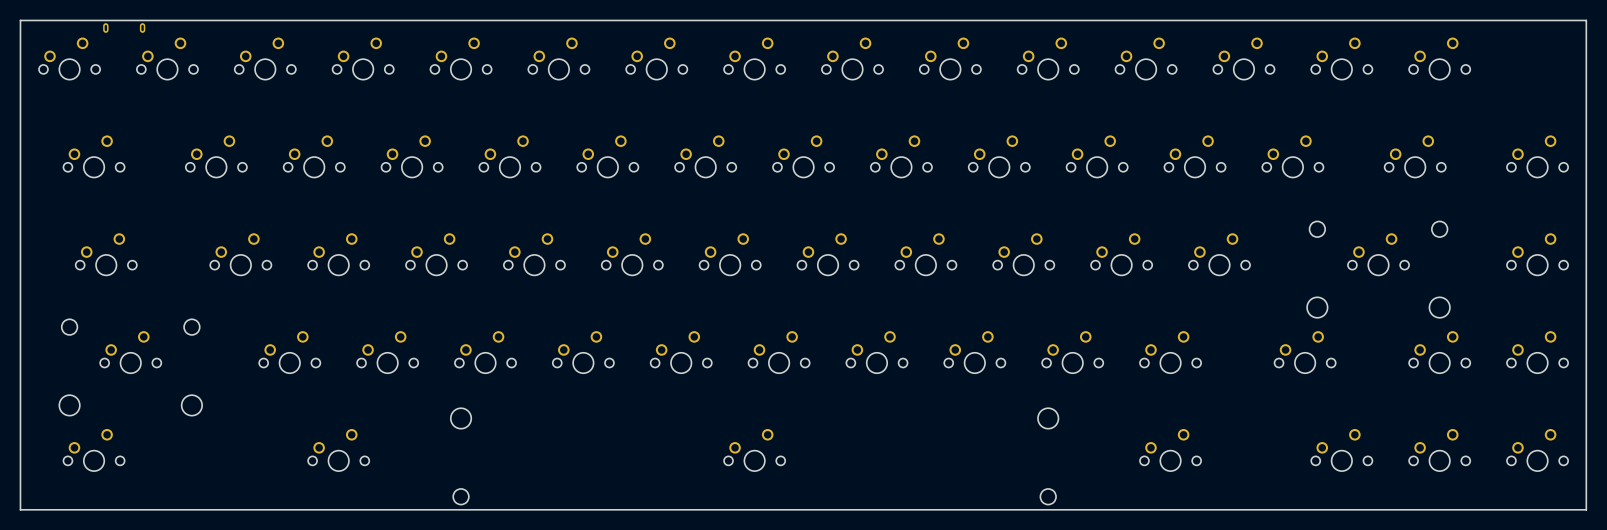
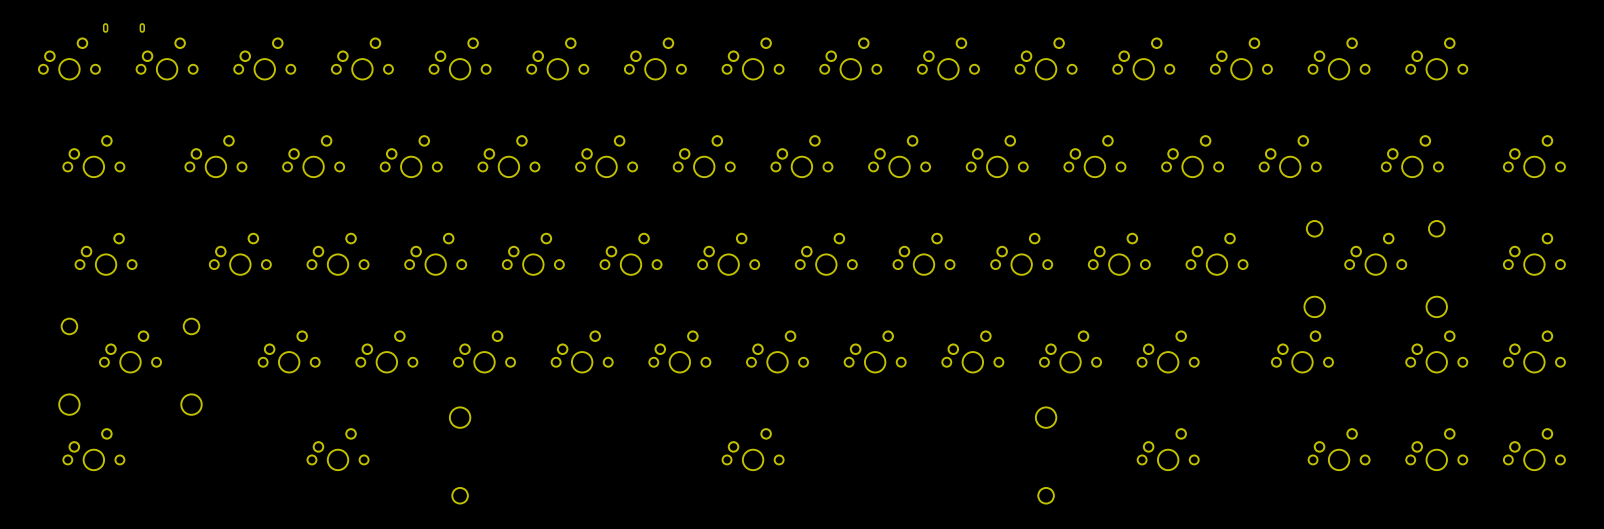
board edge: (20, 20) (20, 509) (1586, 509) (1586, 20) (20, 20) -> none

